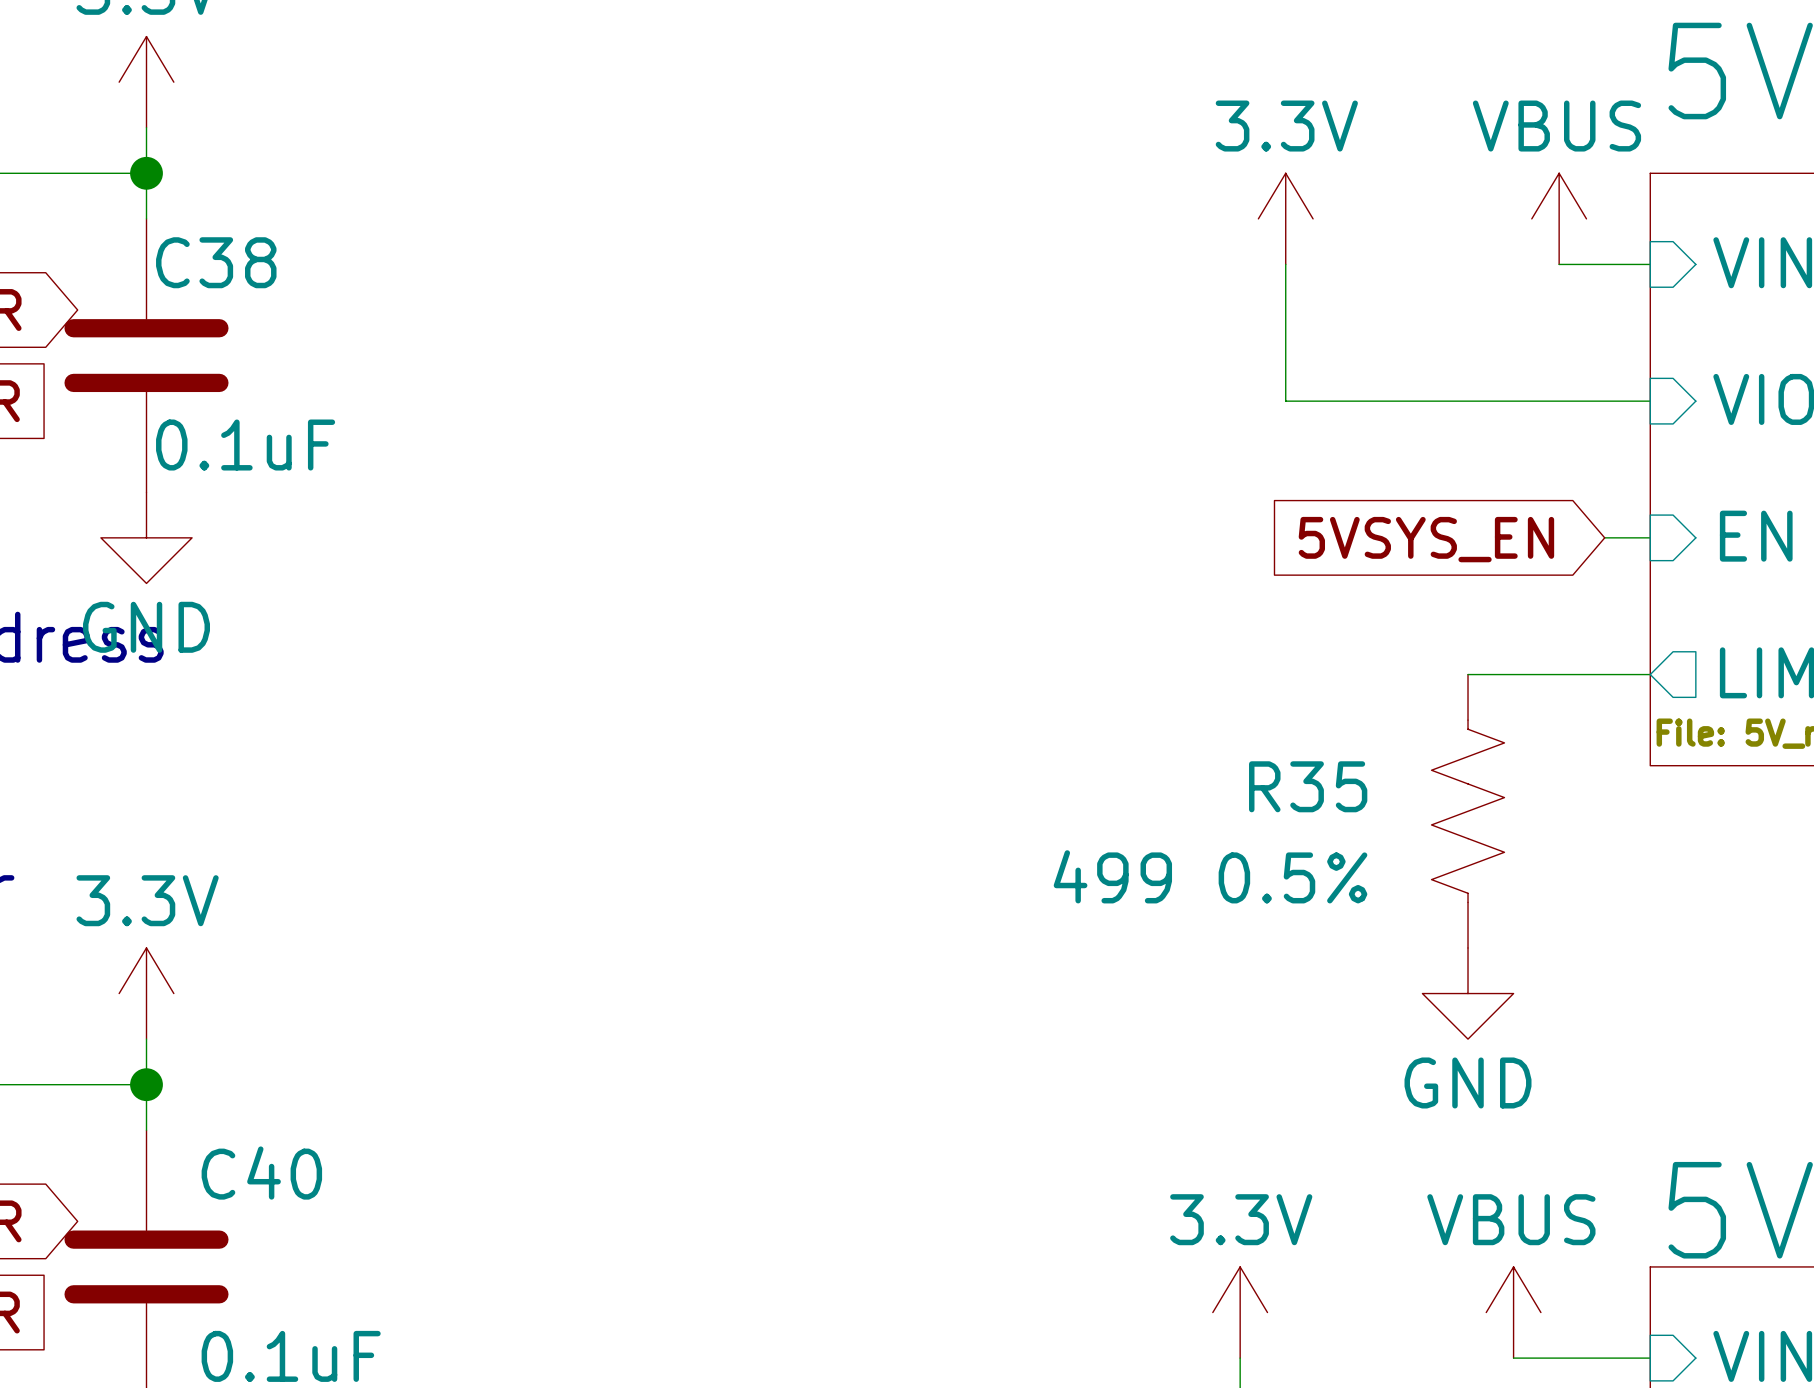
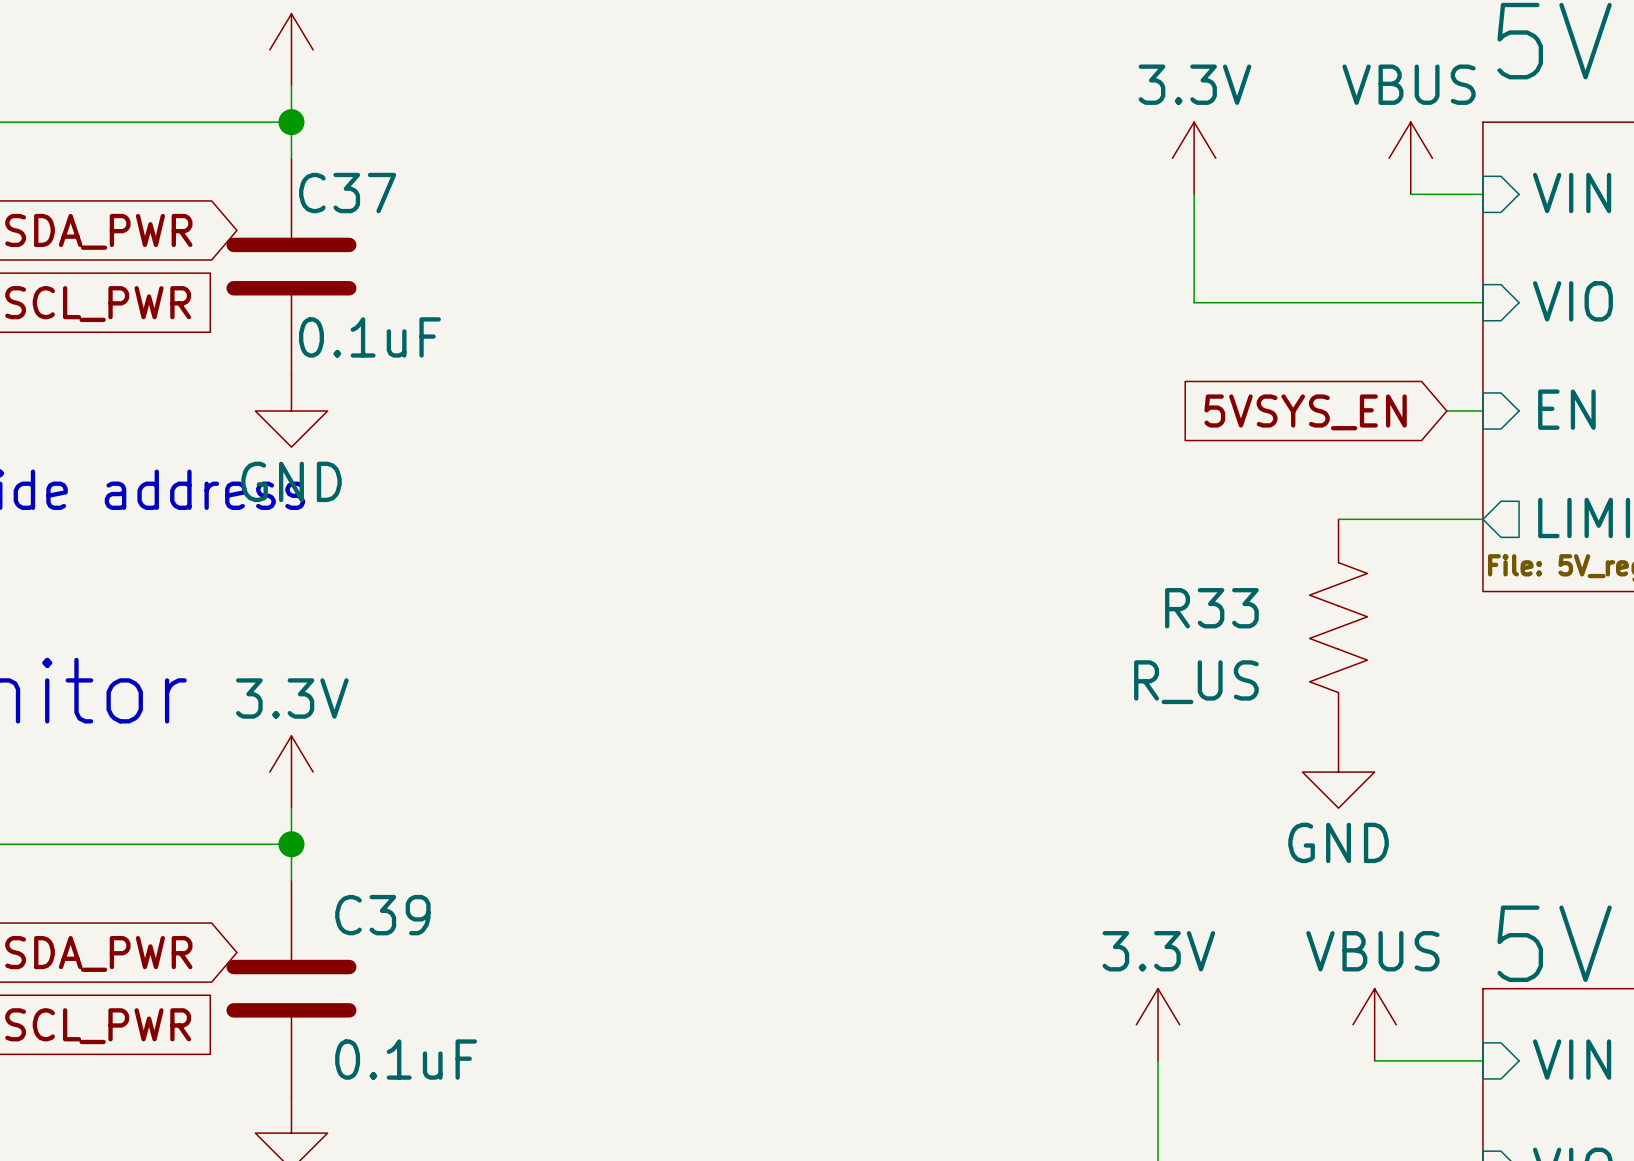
C38 name: C38 (216, 262) -> C37 (347, 193)
R35 name: R35 (1308, 786) -> R33 (1211, 608)
R35 value: 499 0.5% (1210, 876) -> R_US (1196, 682)
C40 name: C40 (261, 1173) -> C39 (382, 915)

